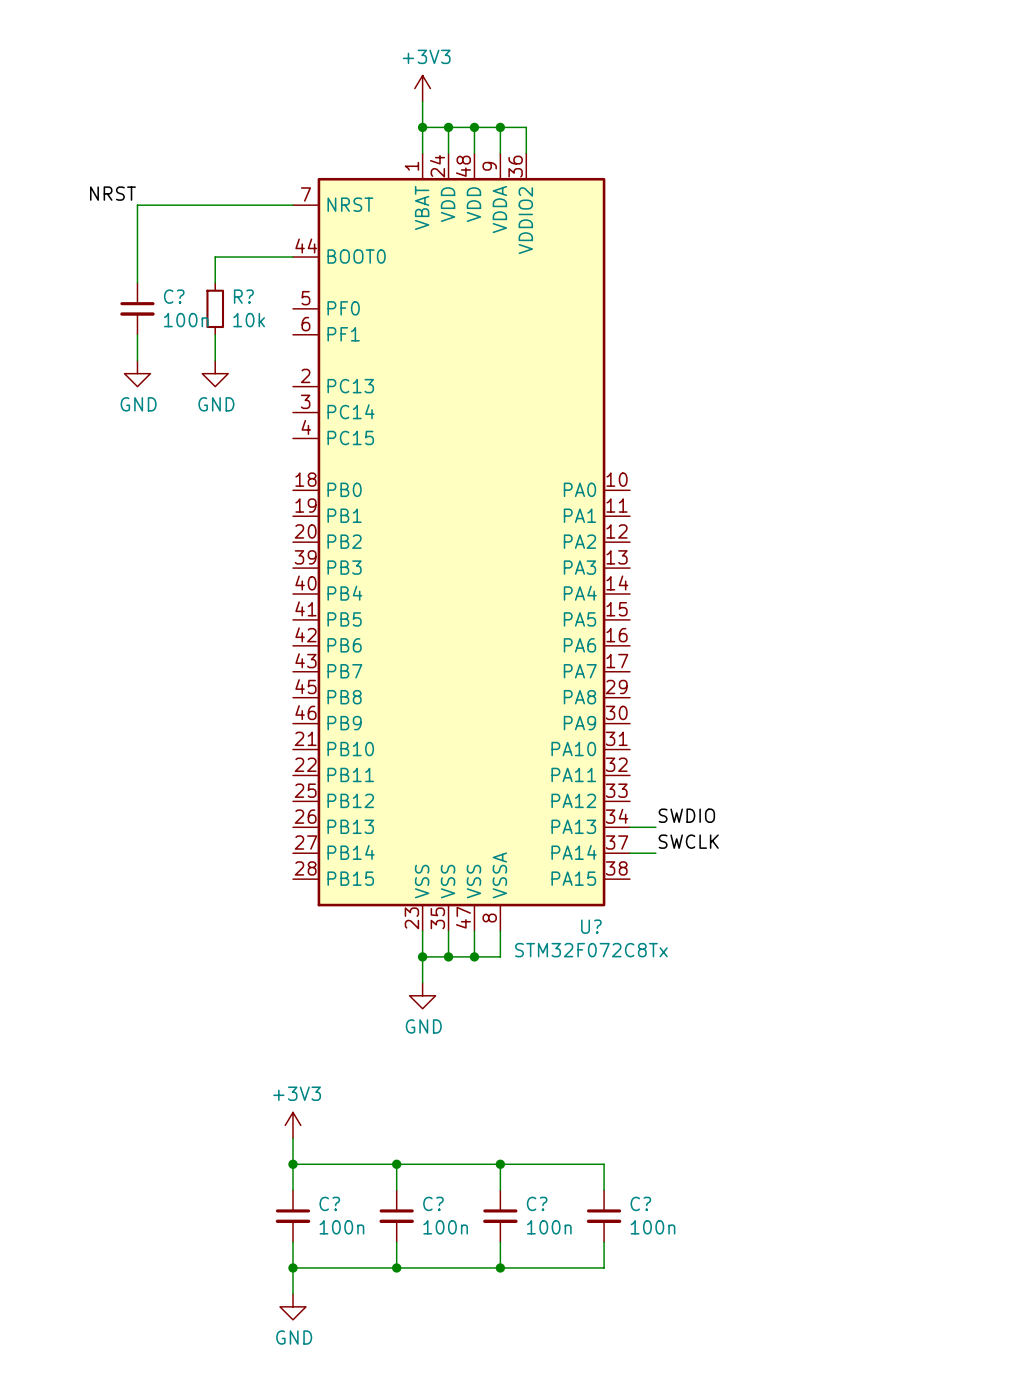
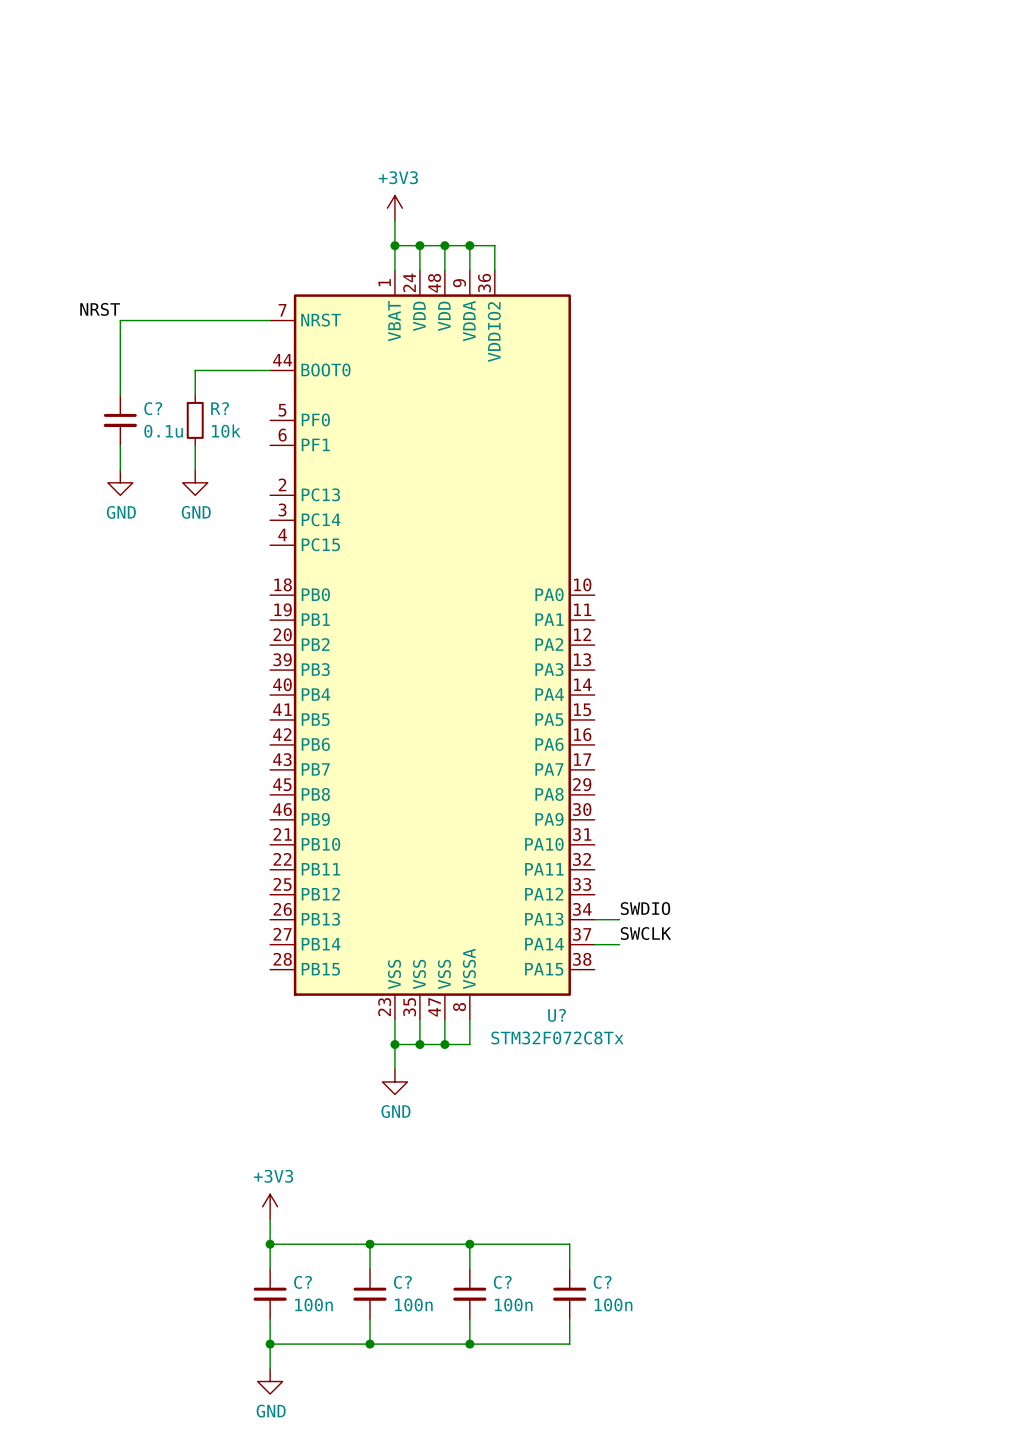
C? value: 100n (186, 320) -> 0.1u (163, 431)

